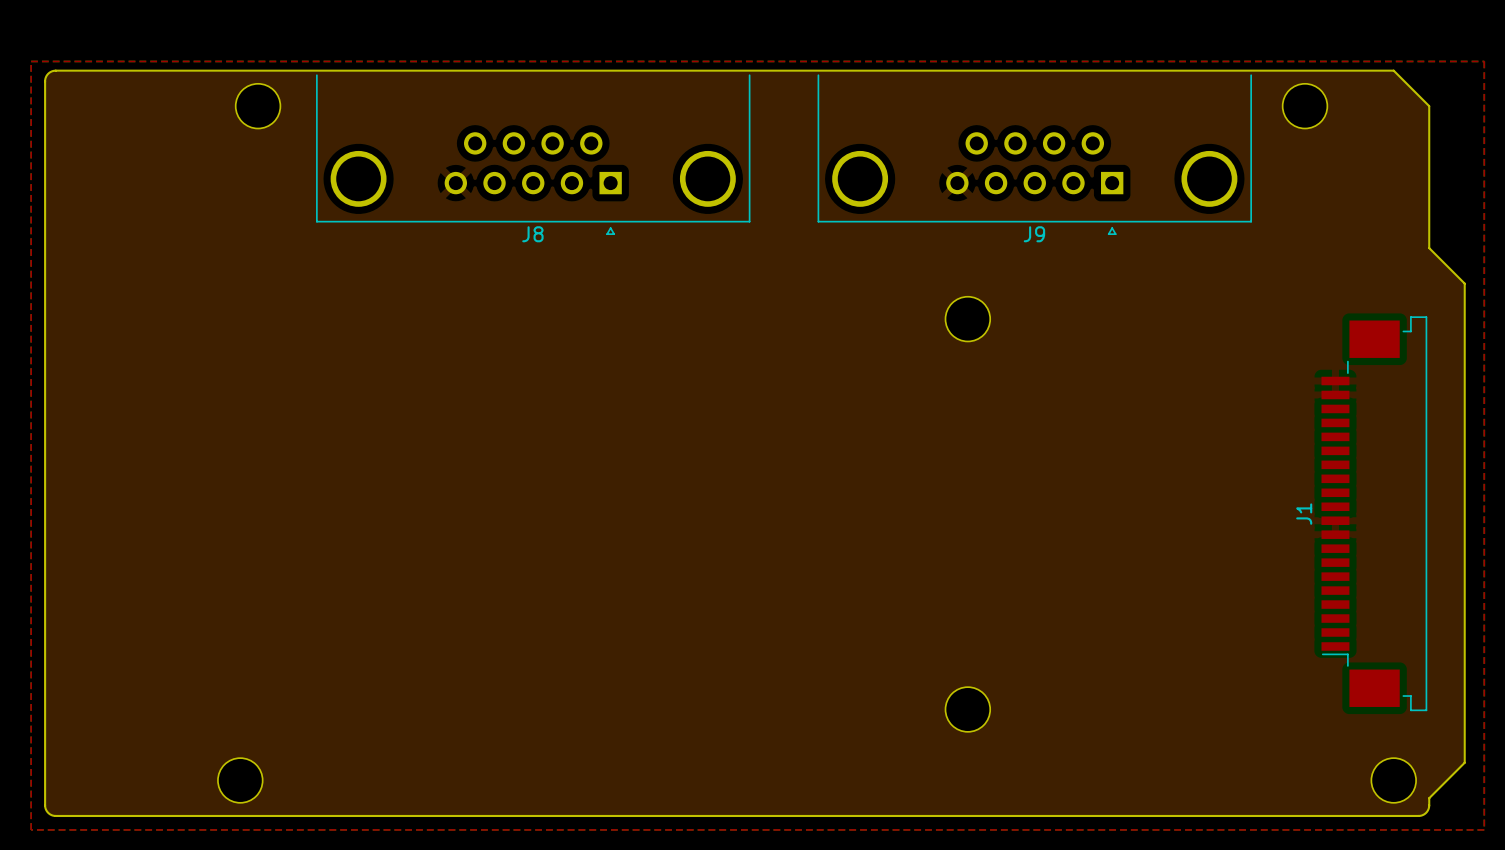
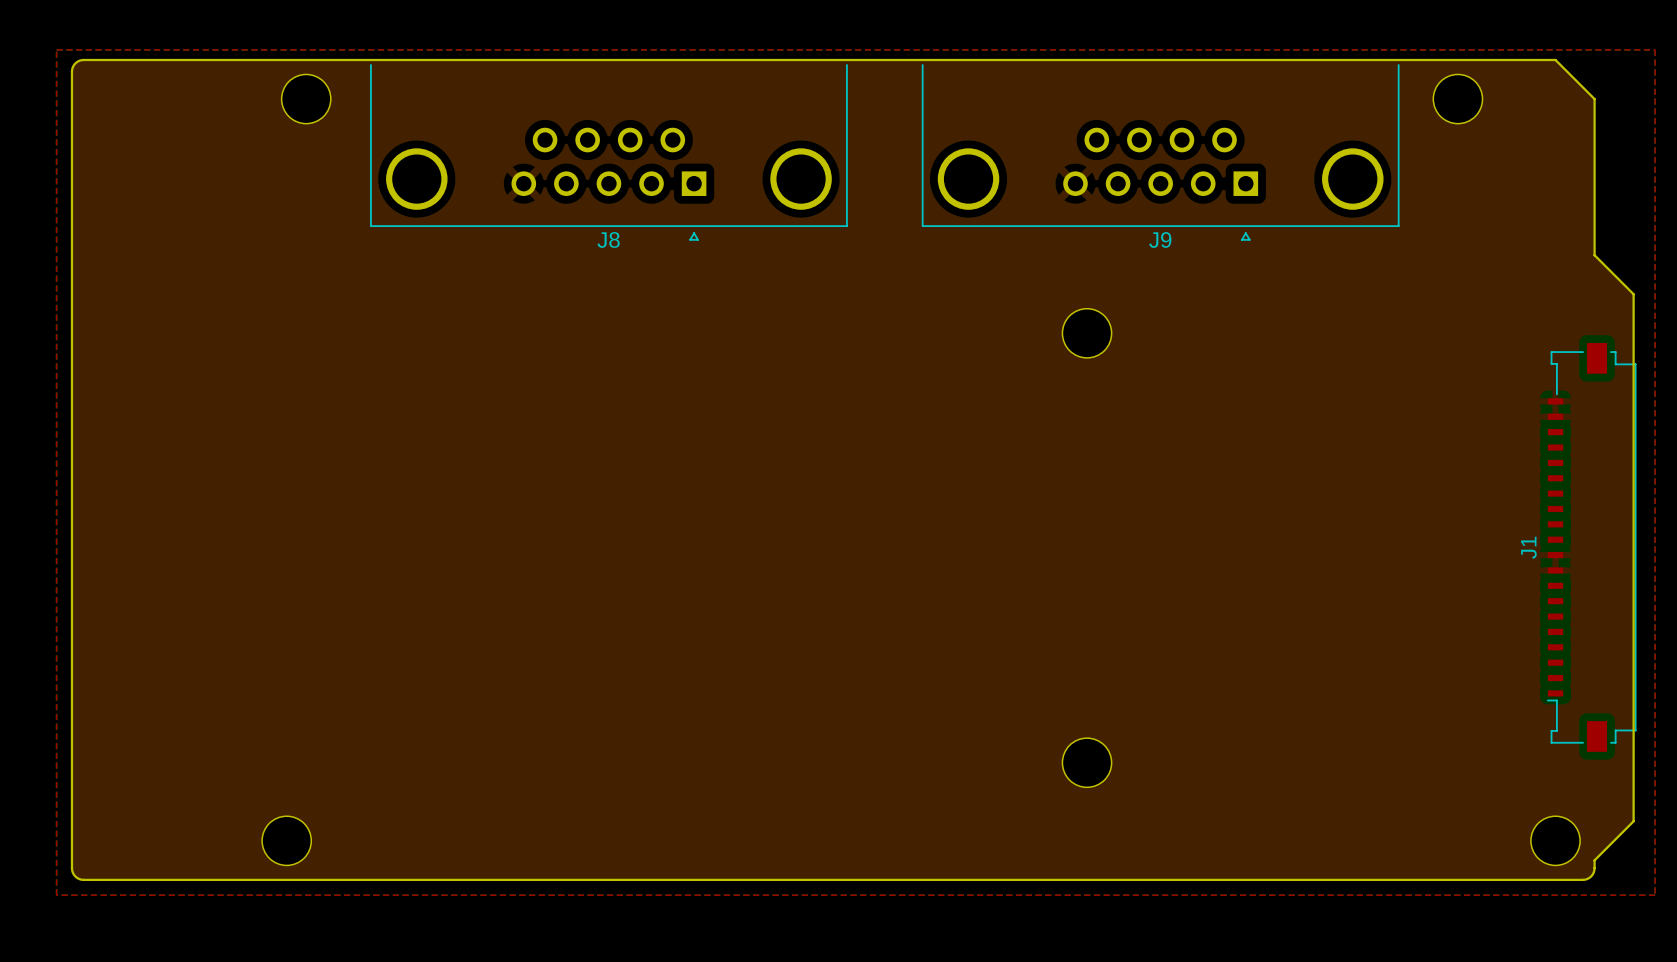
J1 footprint: [1321, 316, 1428, 712] -> [1546, 342, 1637, 752]

